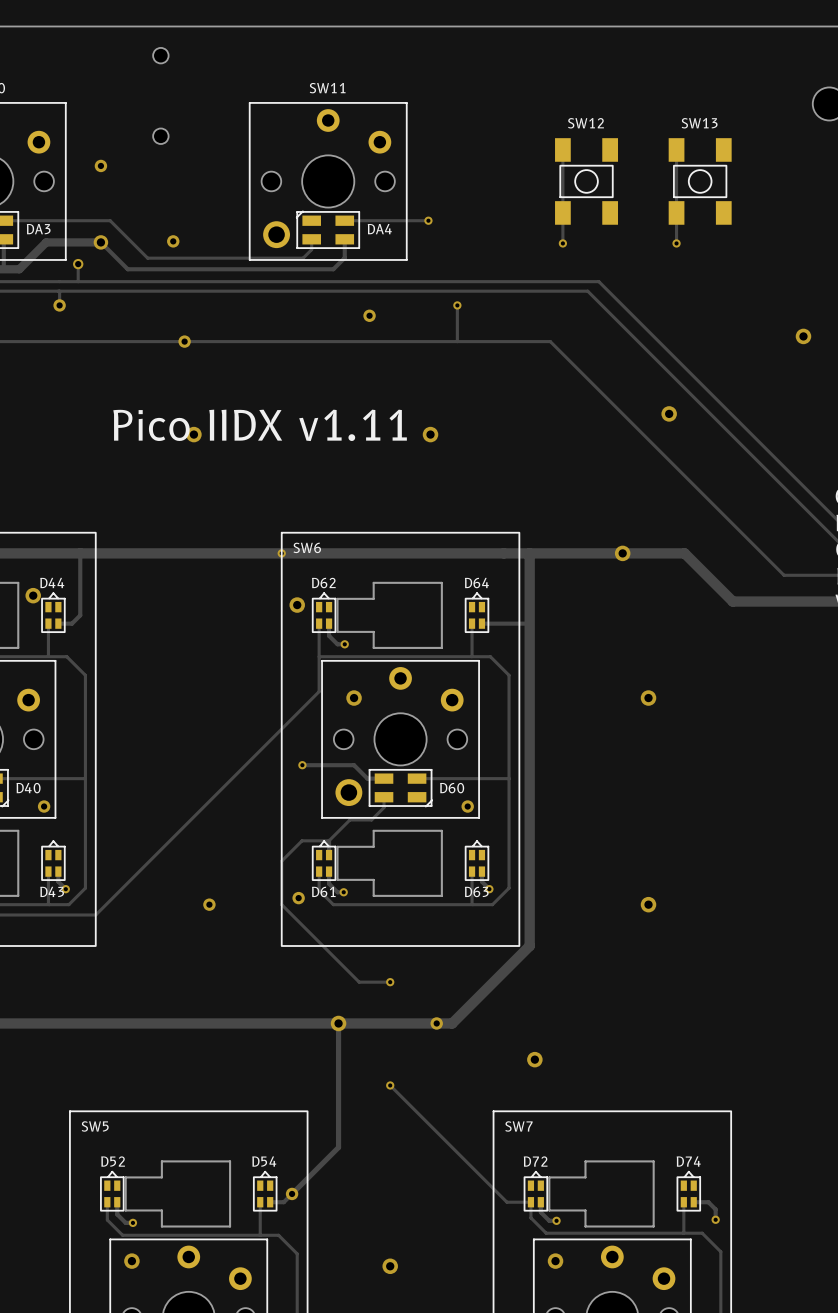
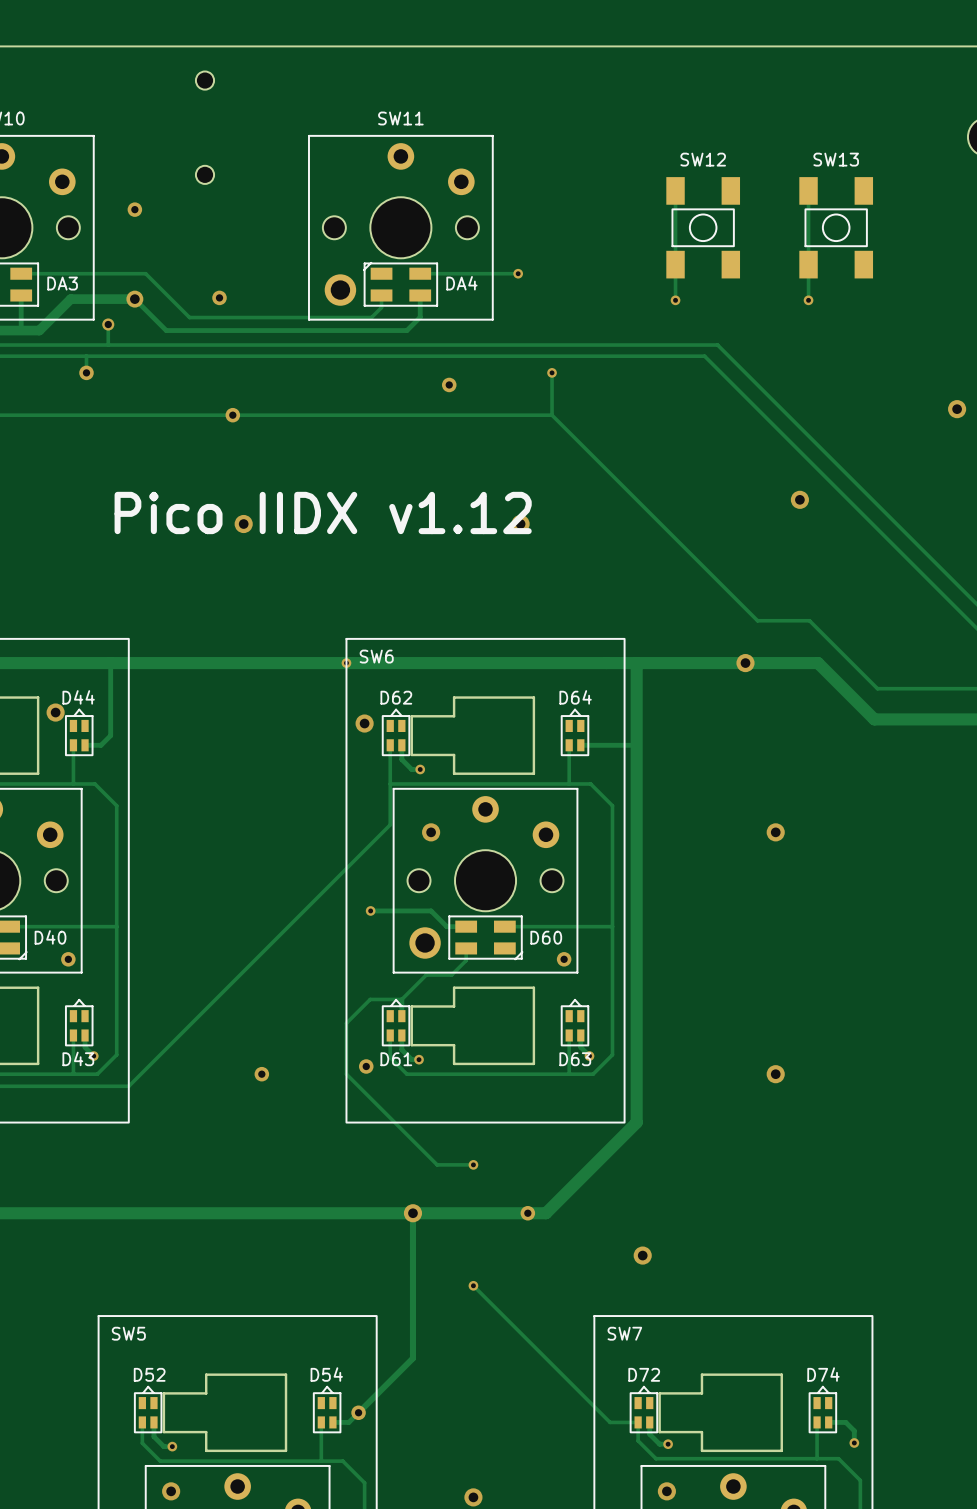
track: (457, 341) (550, 341) (784, 575) -> (552, 415) (757, 620) (809, 620) (877, 688) (934, 688)
text: Pico IIDX v1.11 (260, 425) -> Pico IIDX v1.12 (323, 512)

